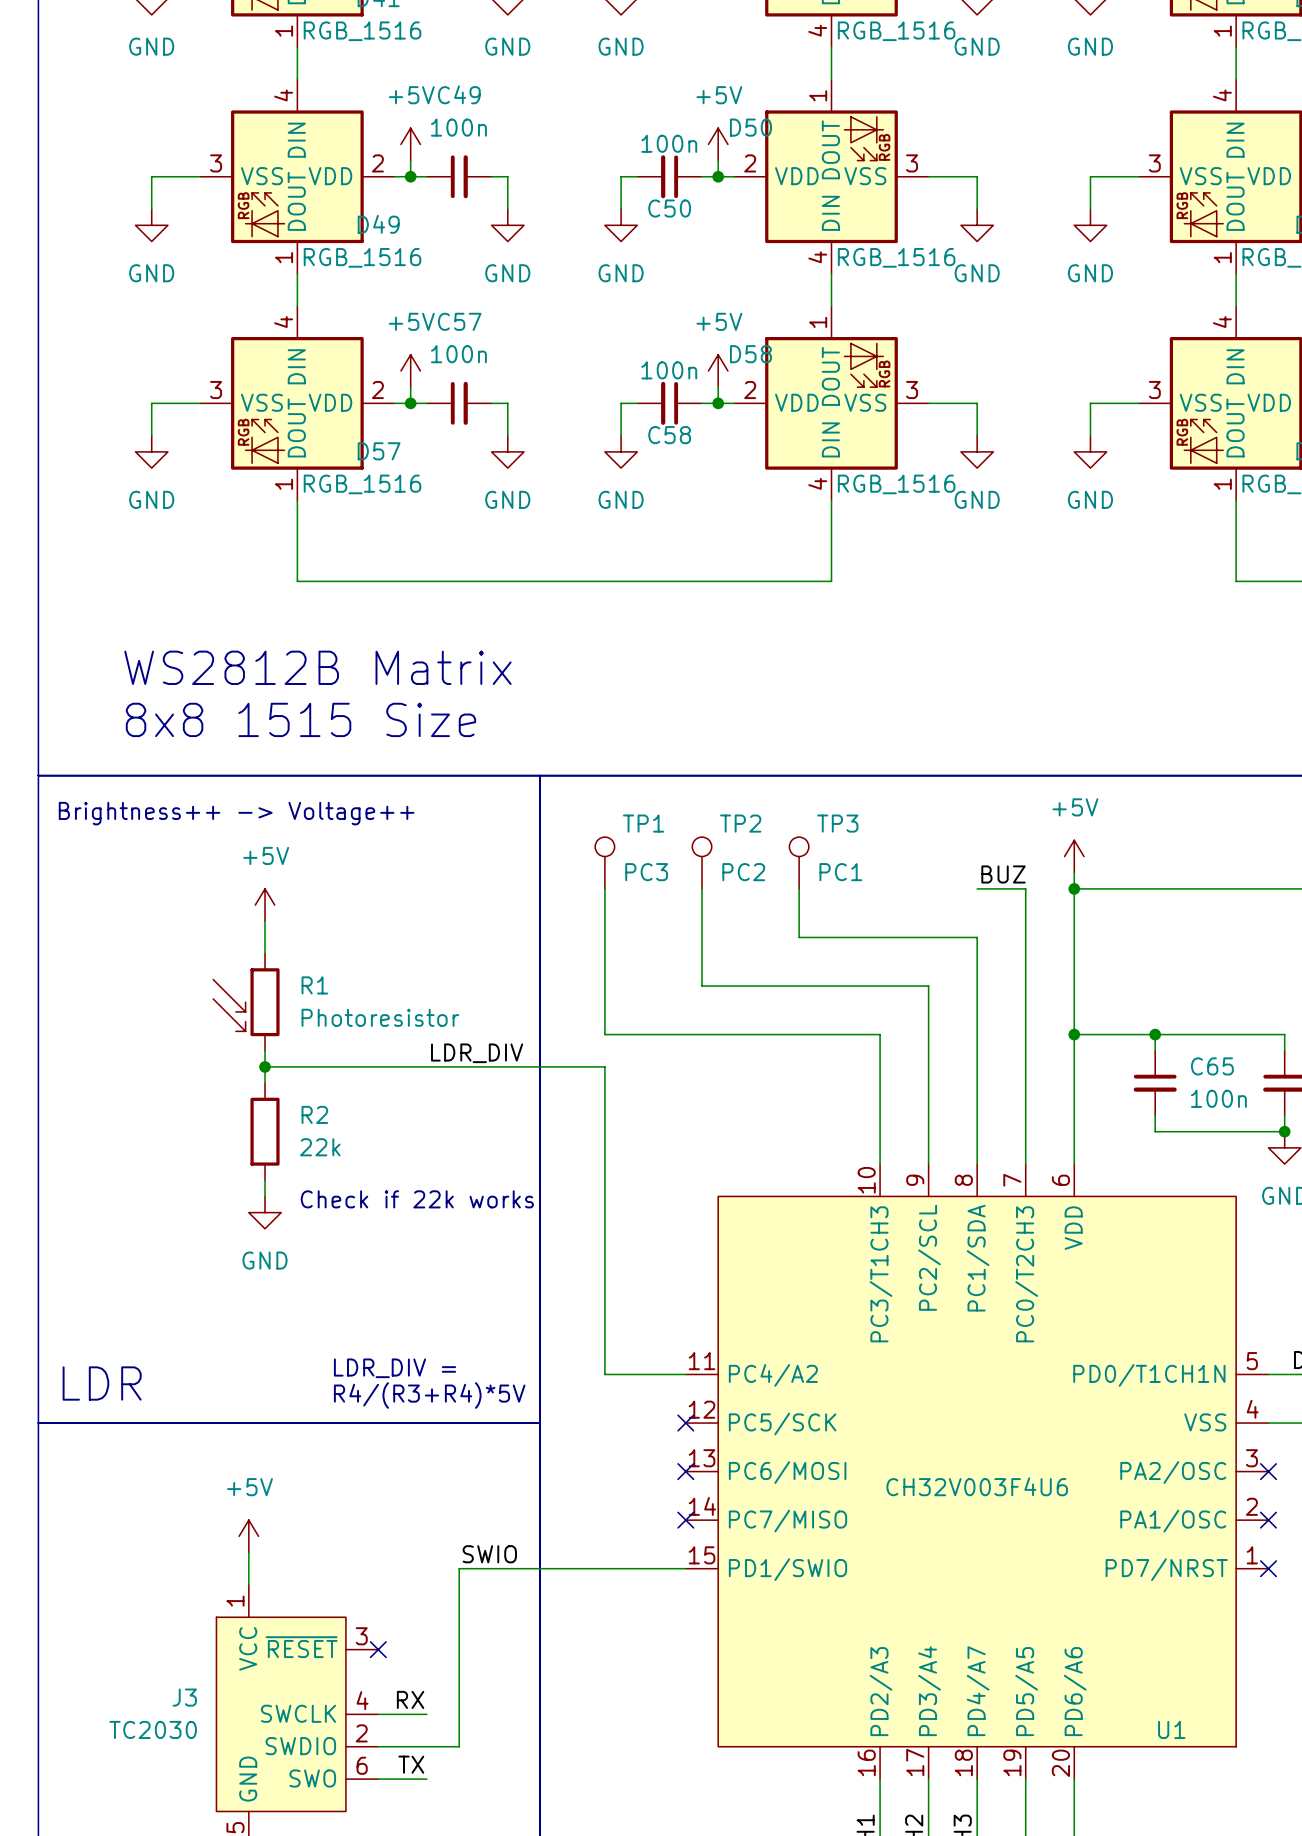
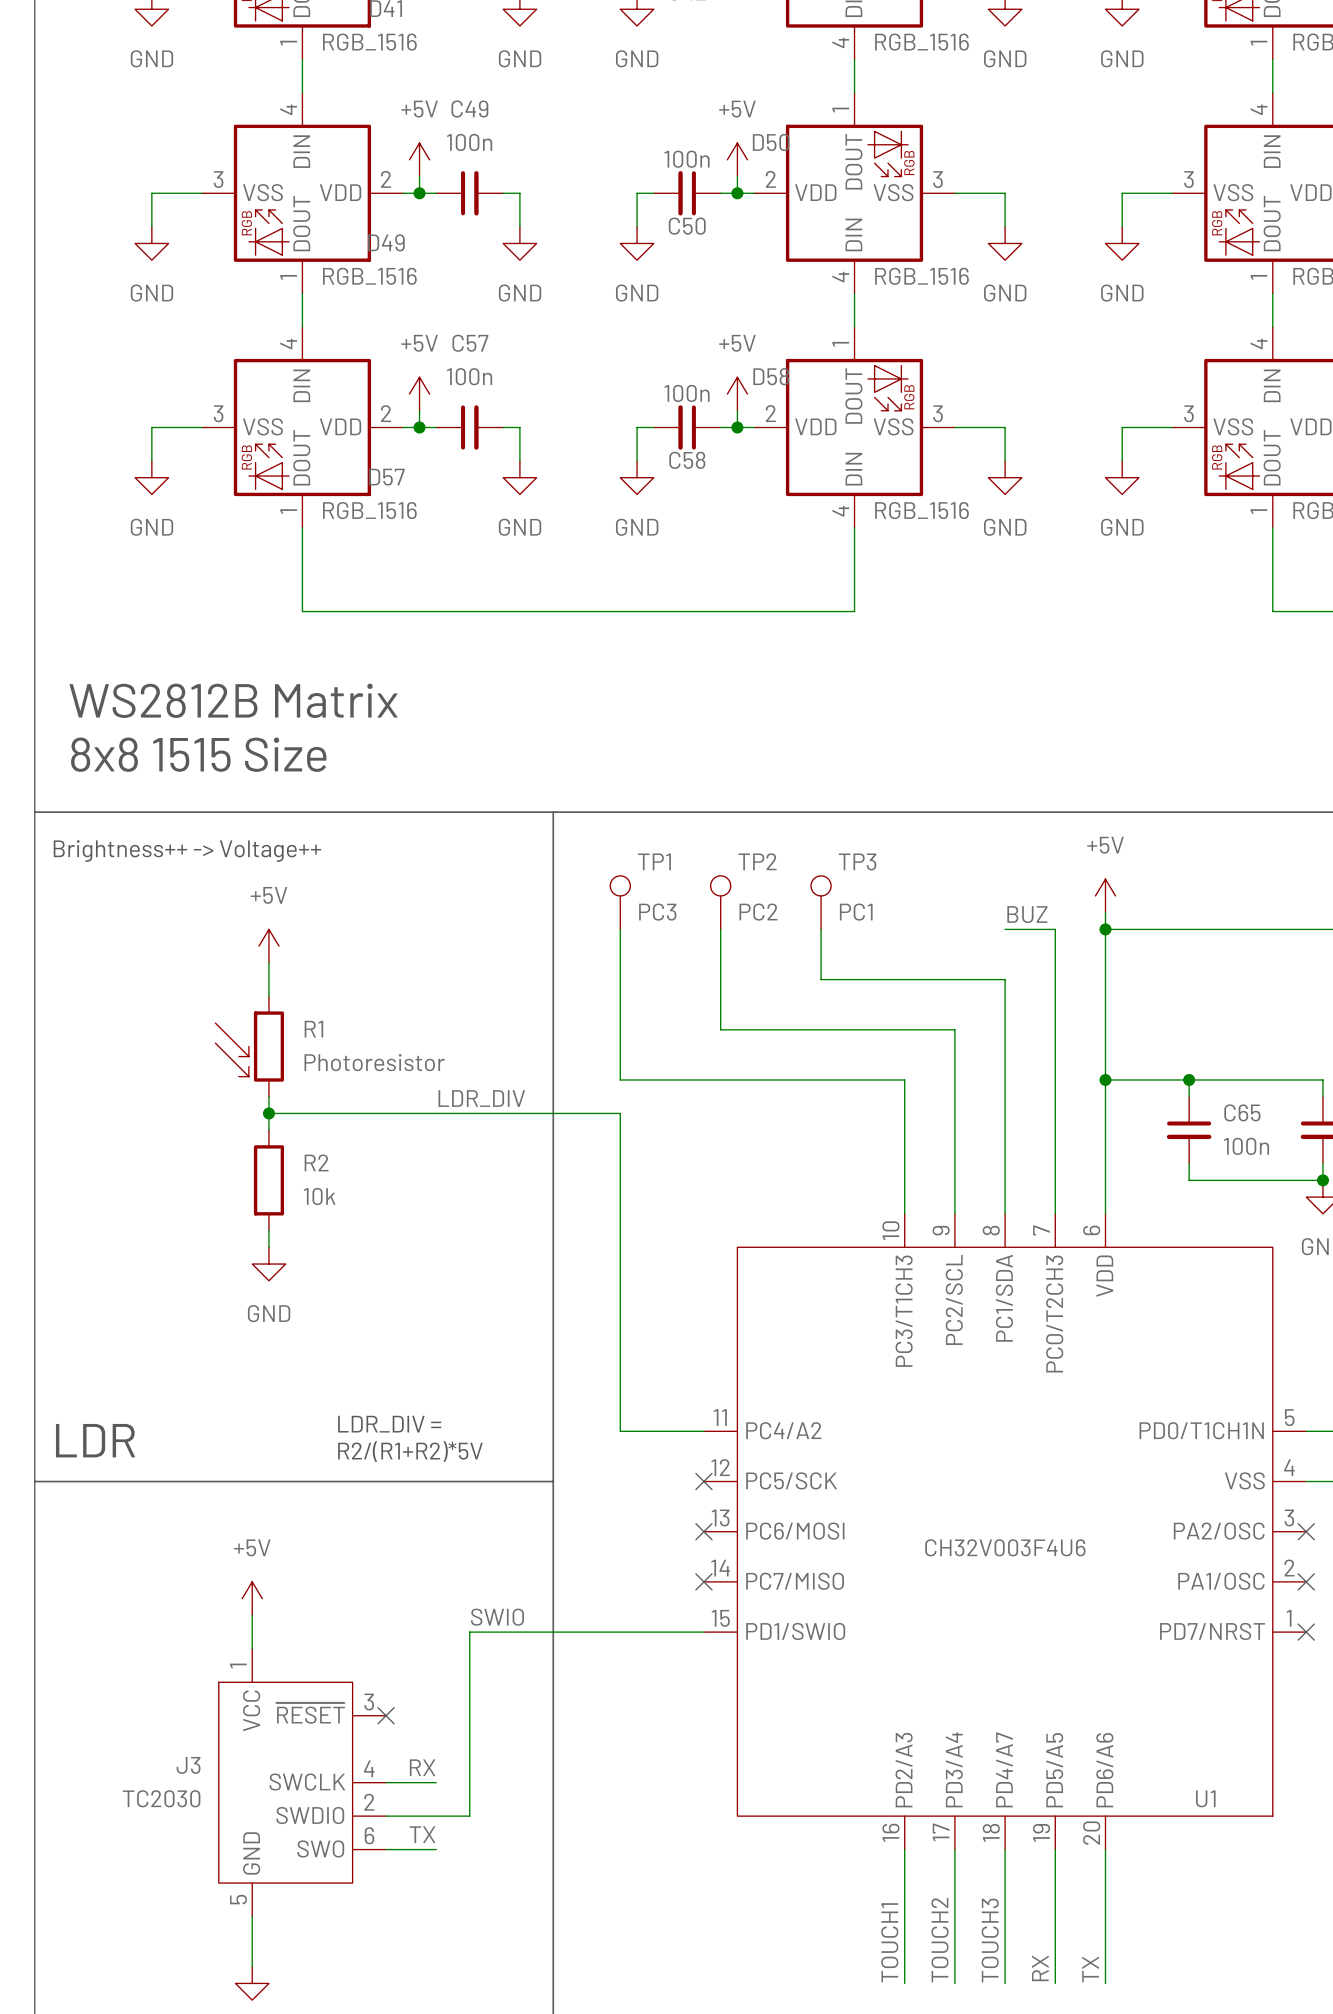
text position: WS2812B Matrix (317, 667) -> WS2812B Matrix (233, 700)
text position: 8x8 1515 Size (300, 719) -> 8x8 1515 Size (198, 754)
R2 value: 22k (320, 1147) -> 10k (319, 1196)
text: Check if 22k works (417, 1199) -> none
text: R4/(R3+R4)*5V (429, 1395) -> R2/(R1+R2)*5V (410, 1451)

